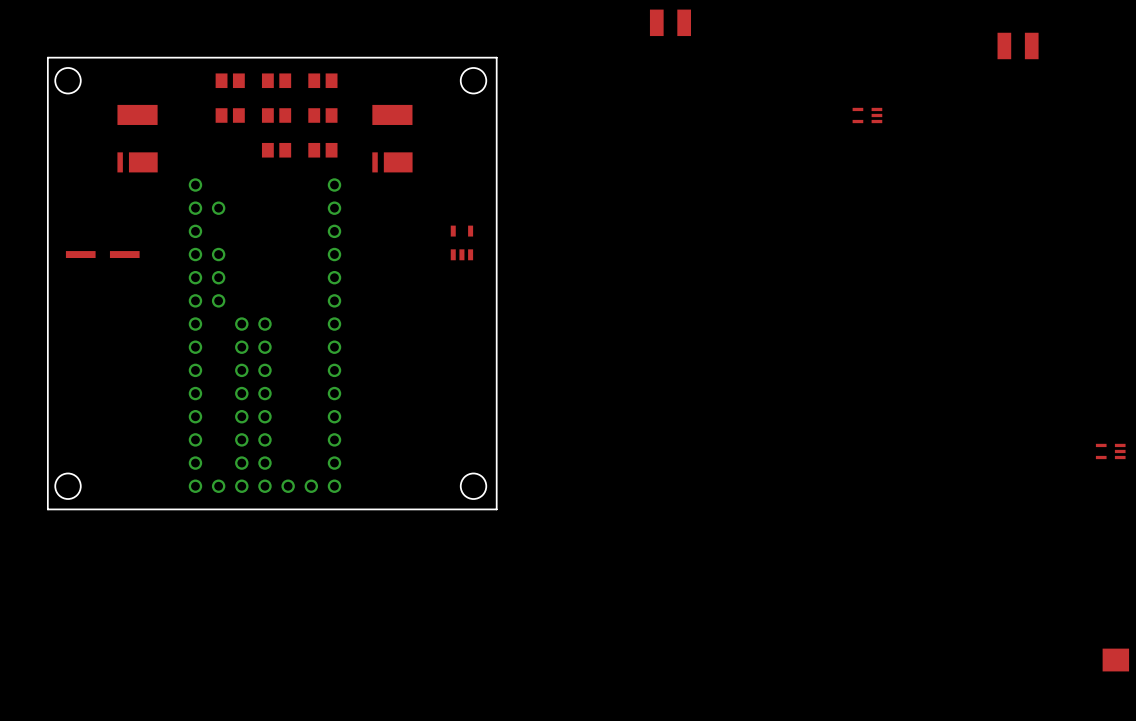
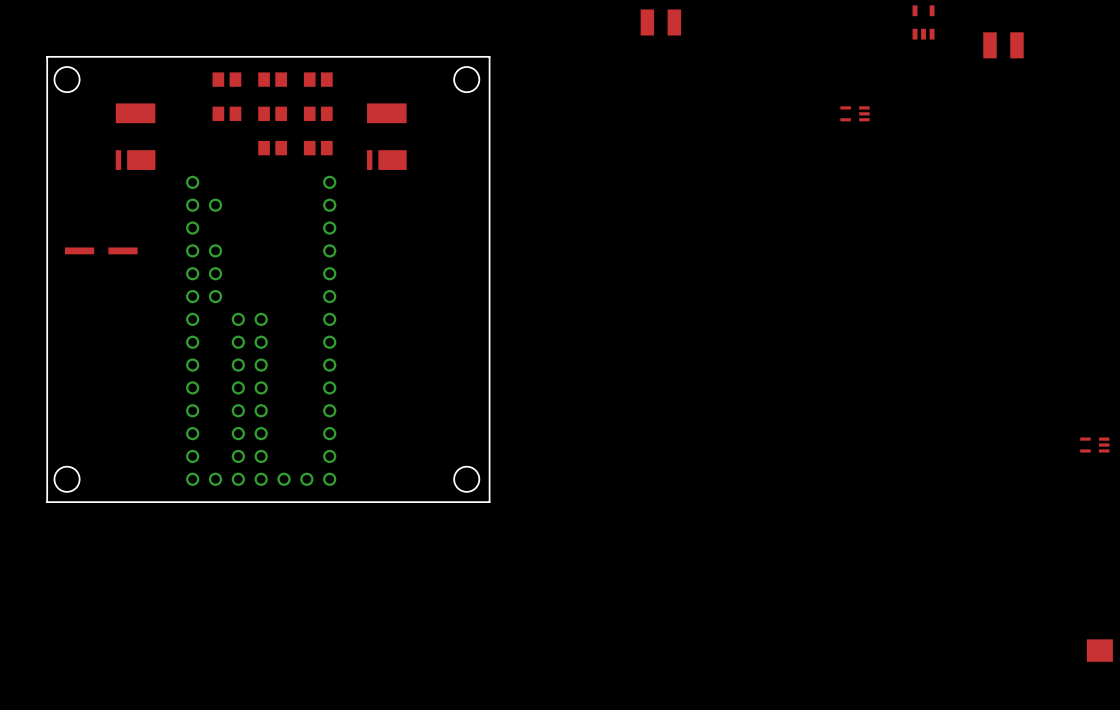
part: none -> (923, 22)
part: (461, 242) -> none

